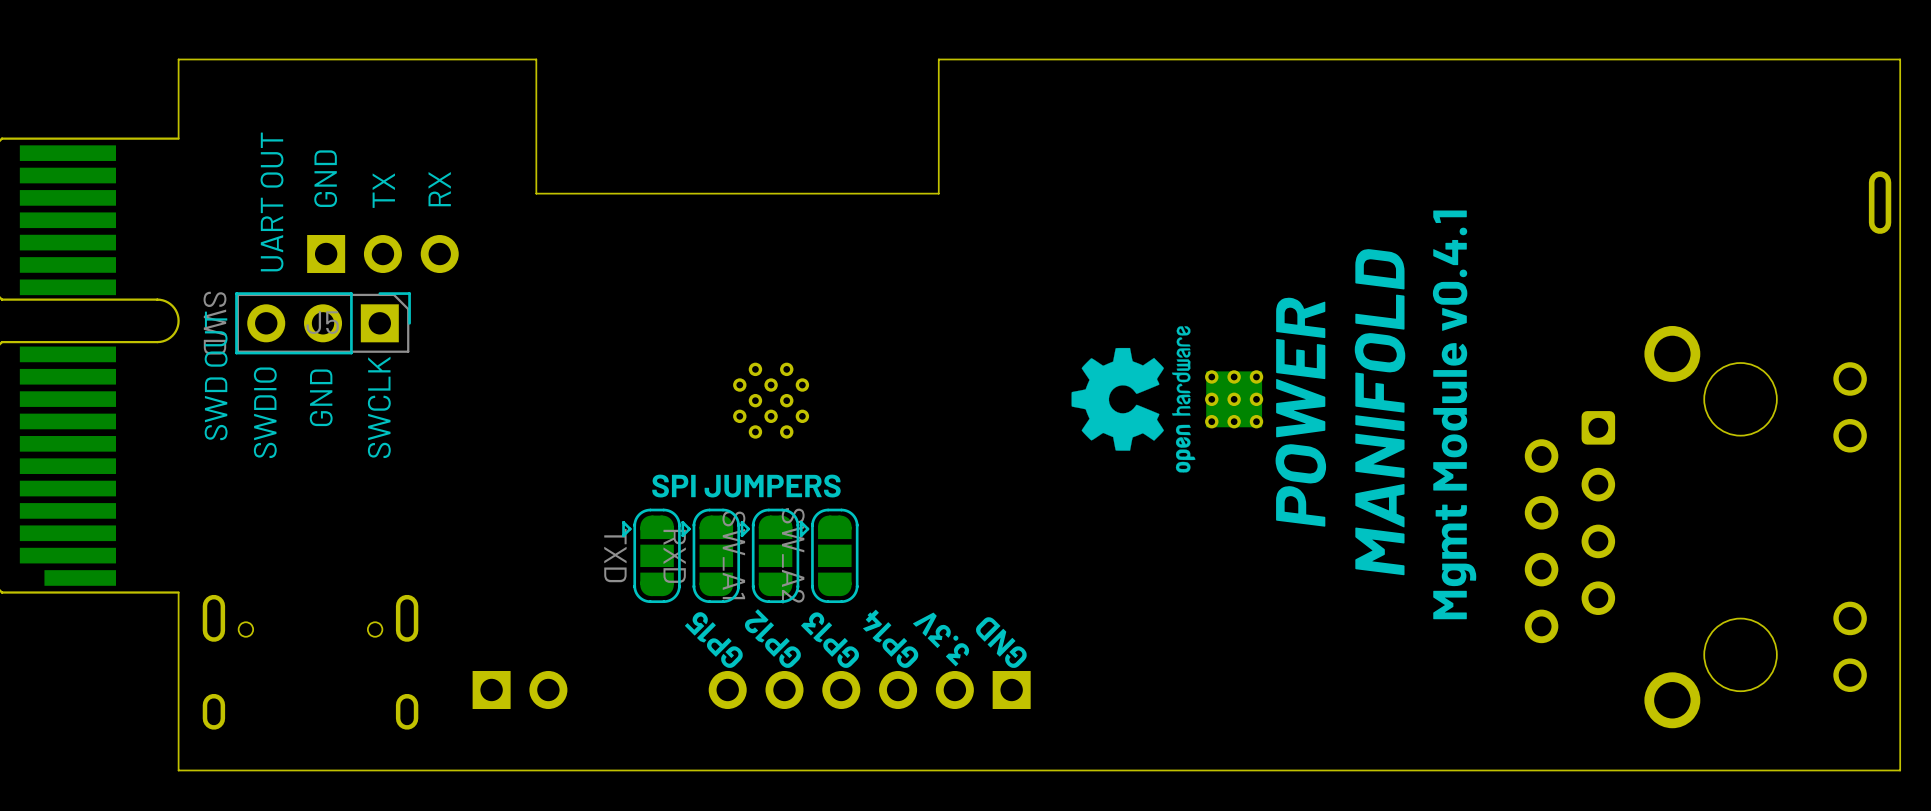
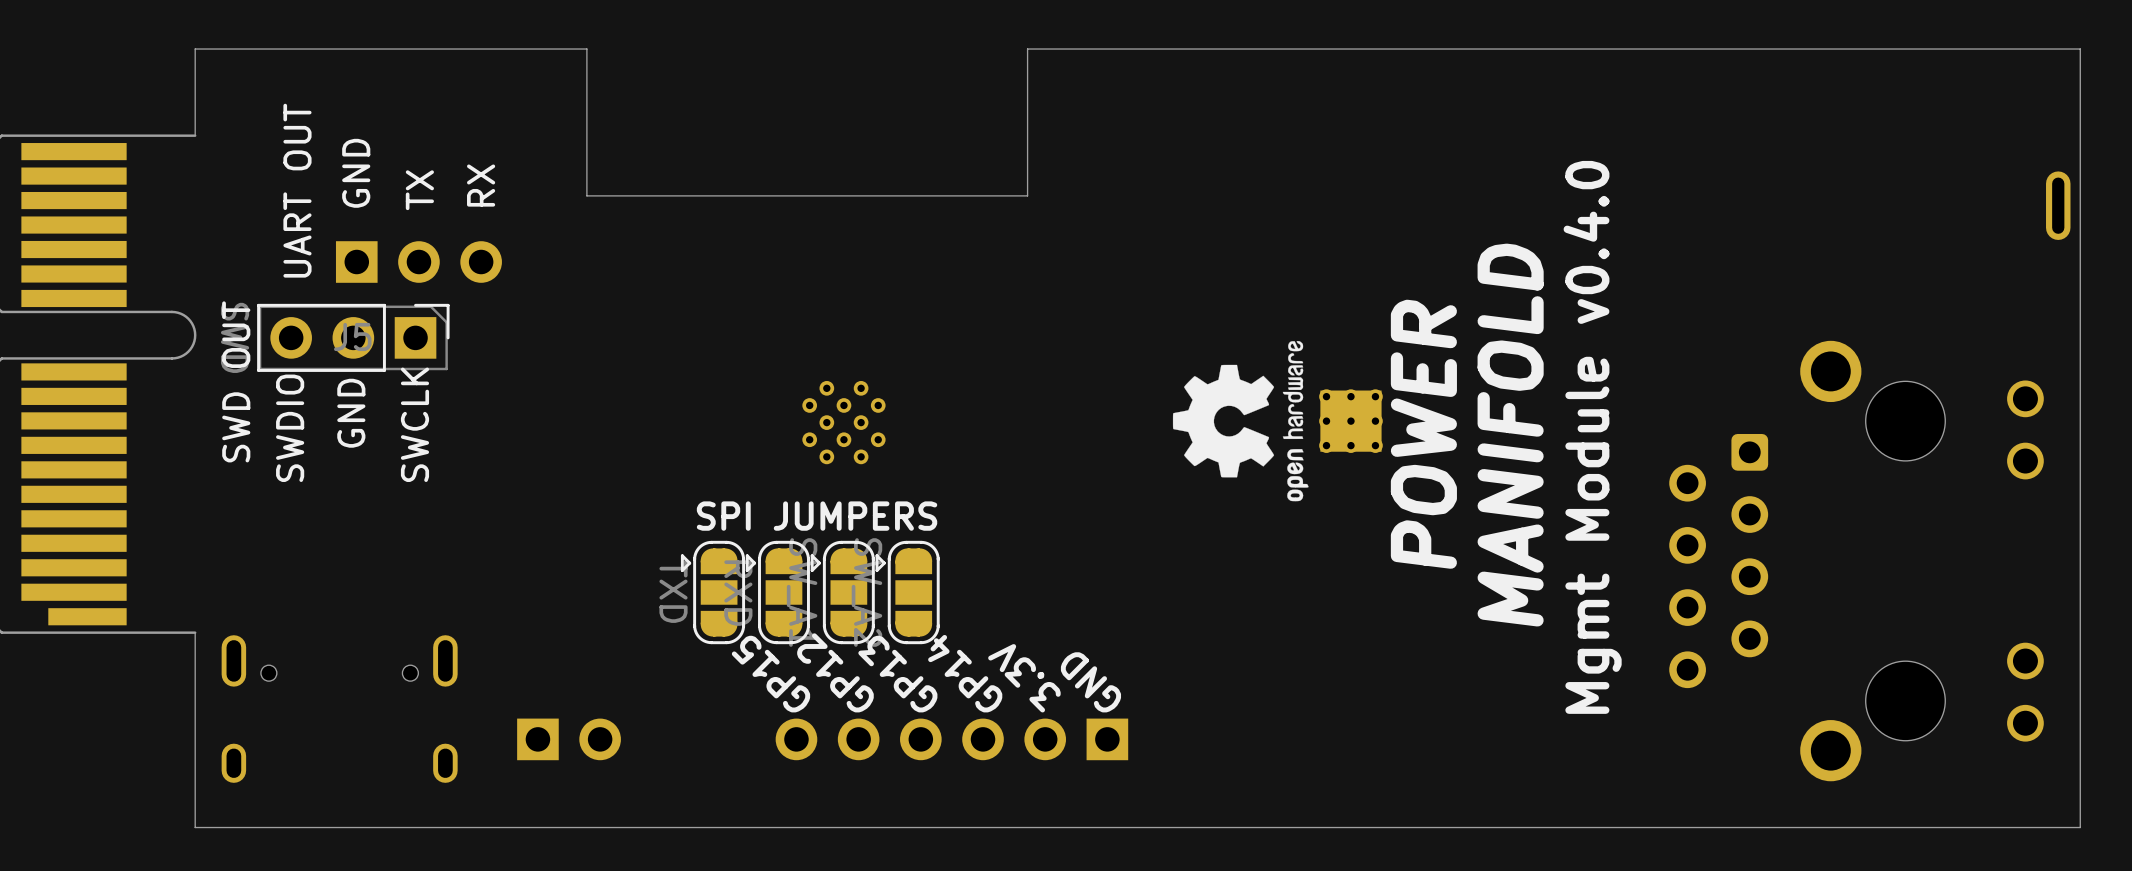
text: Mgmt Module v0.4.1 (1454, 414) -> Mgmt Module v0.4.0 (1592, 437)

